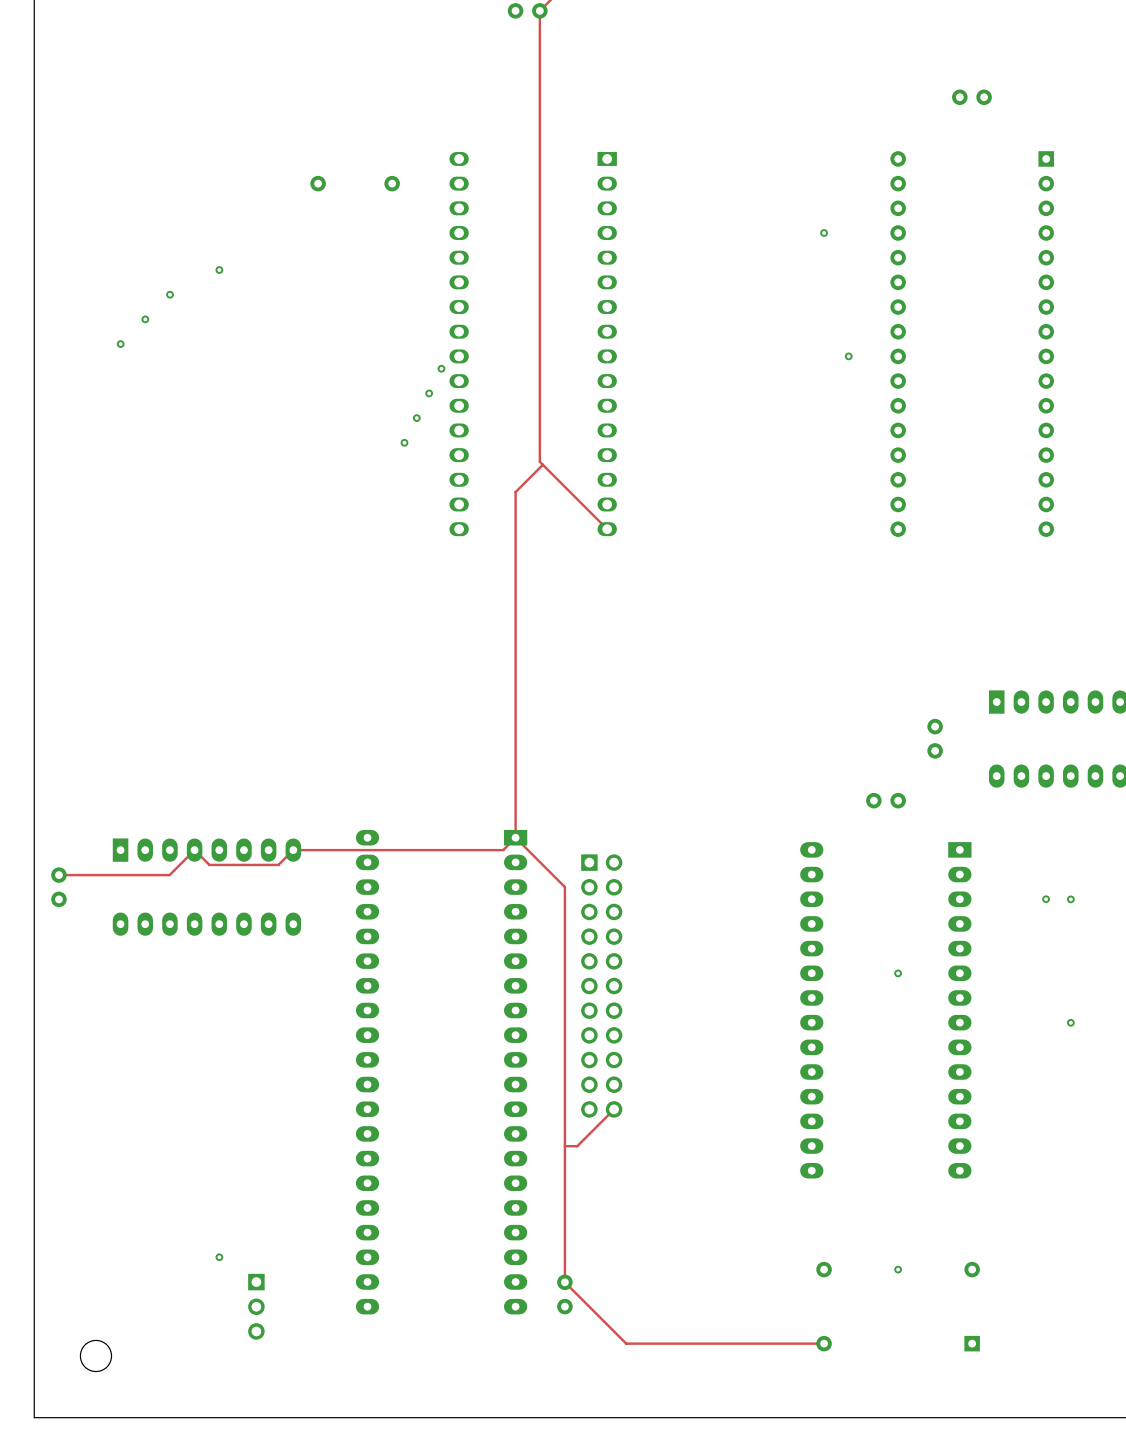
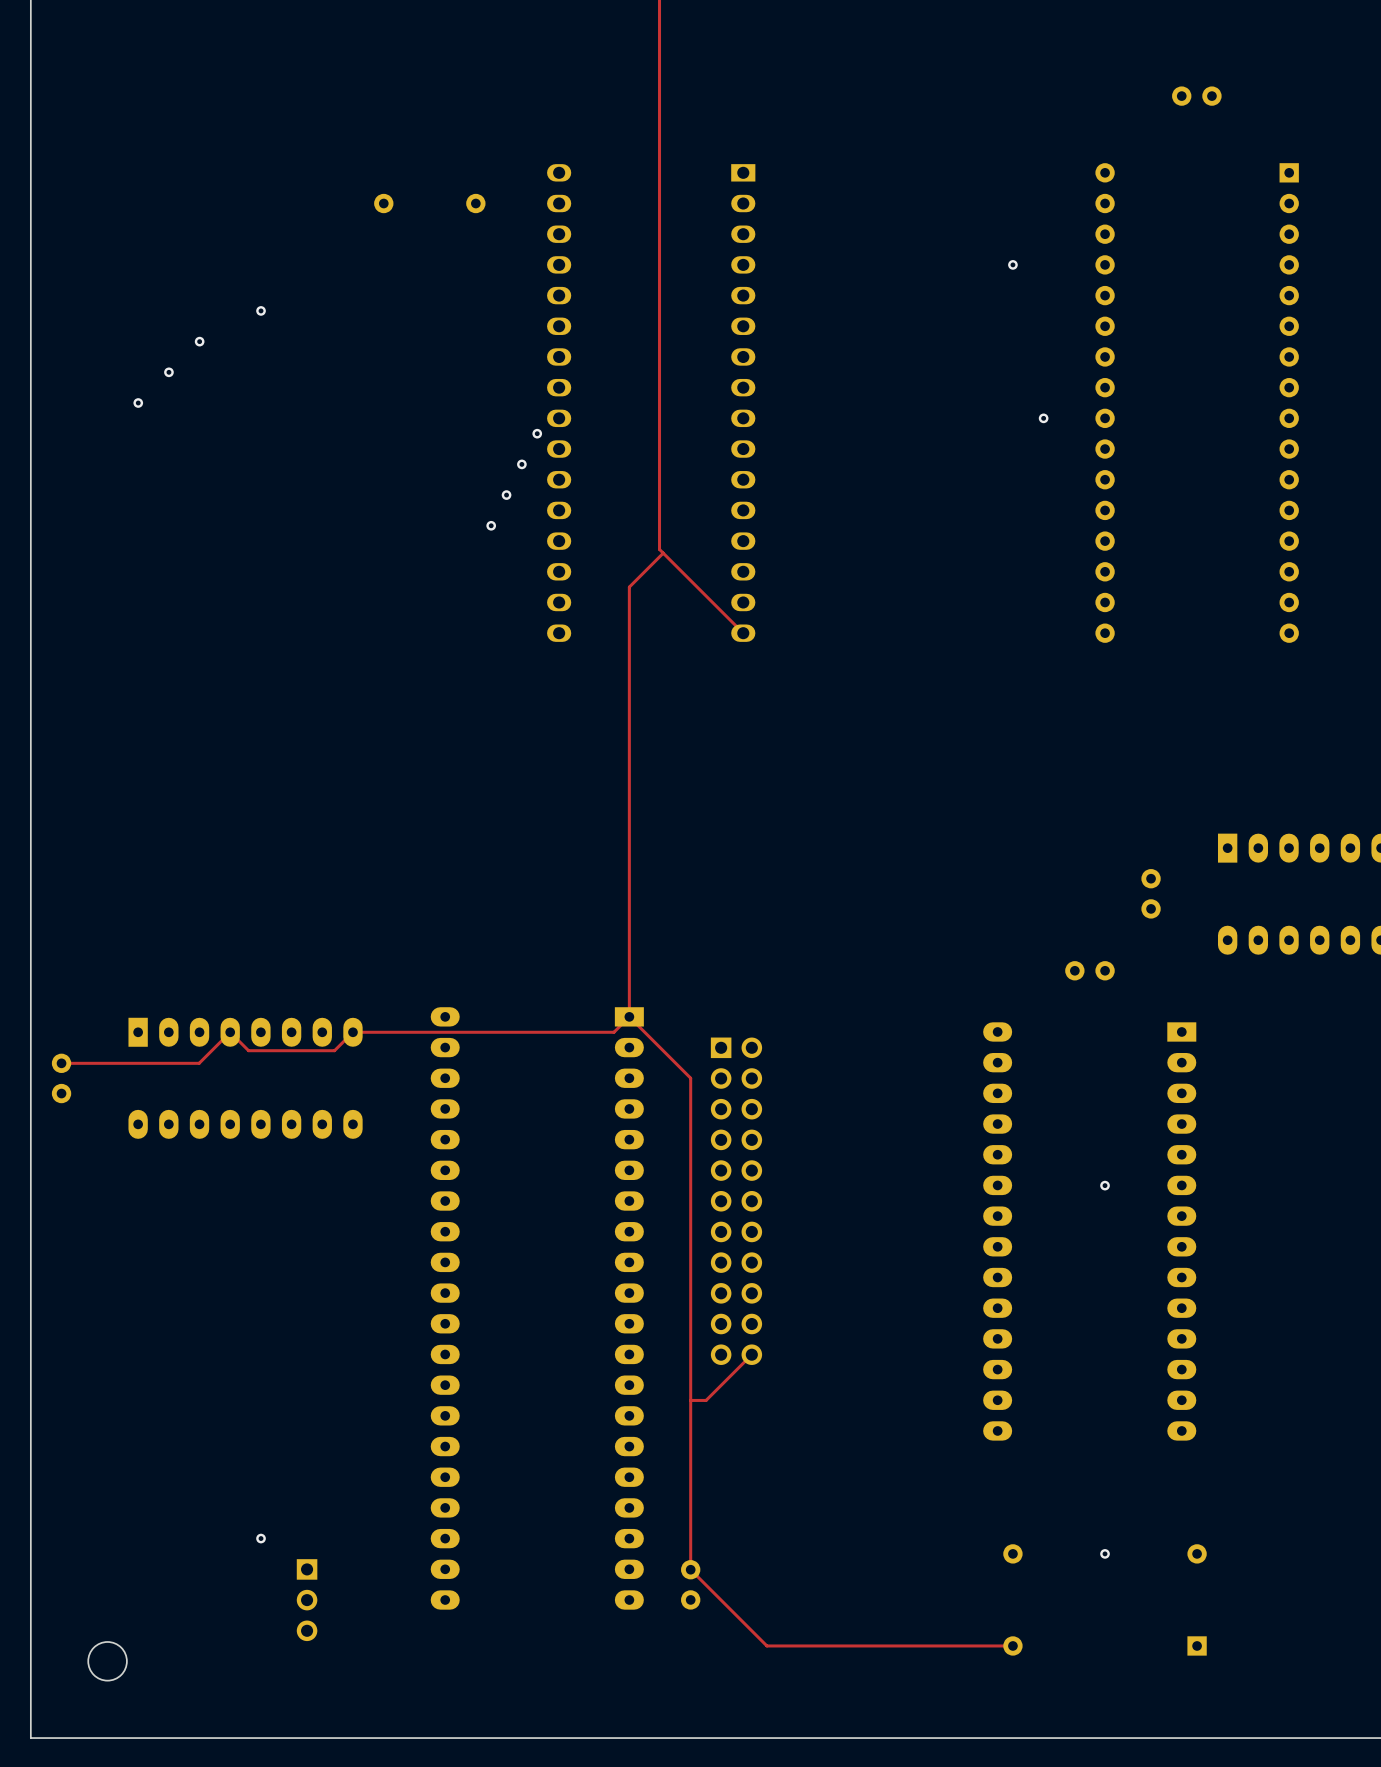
via: (1046, 899) -> none
via: (1070, 899) -> none
via: (1070, 1022) -> none

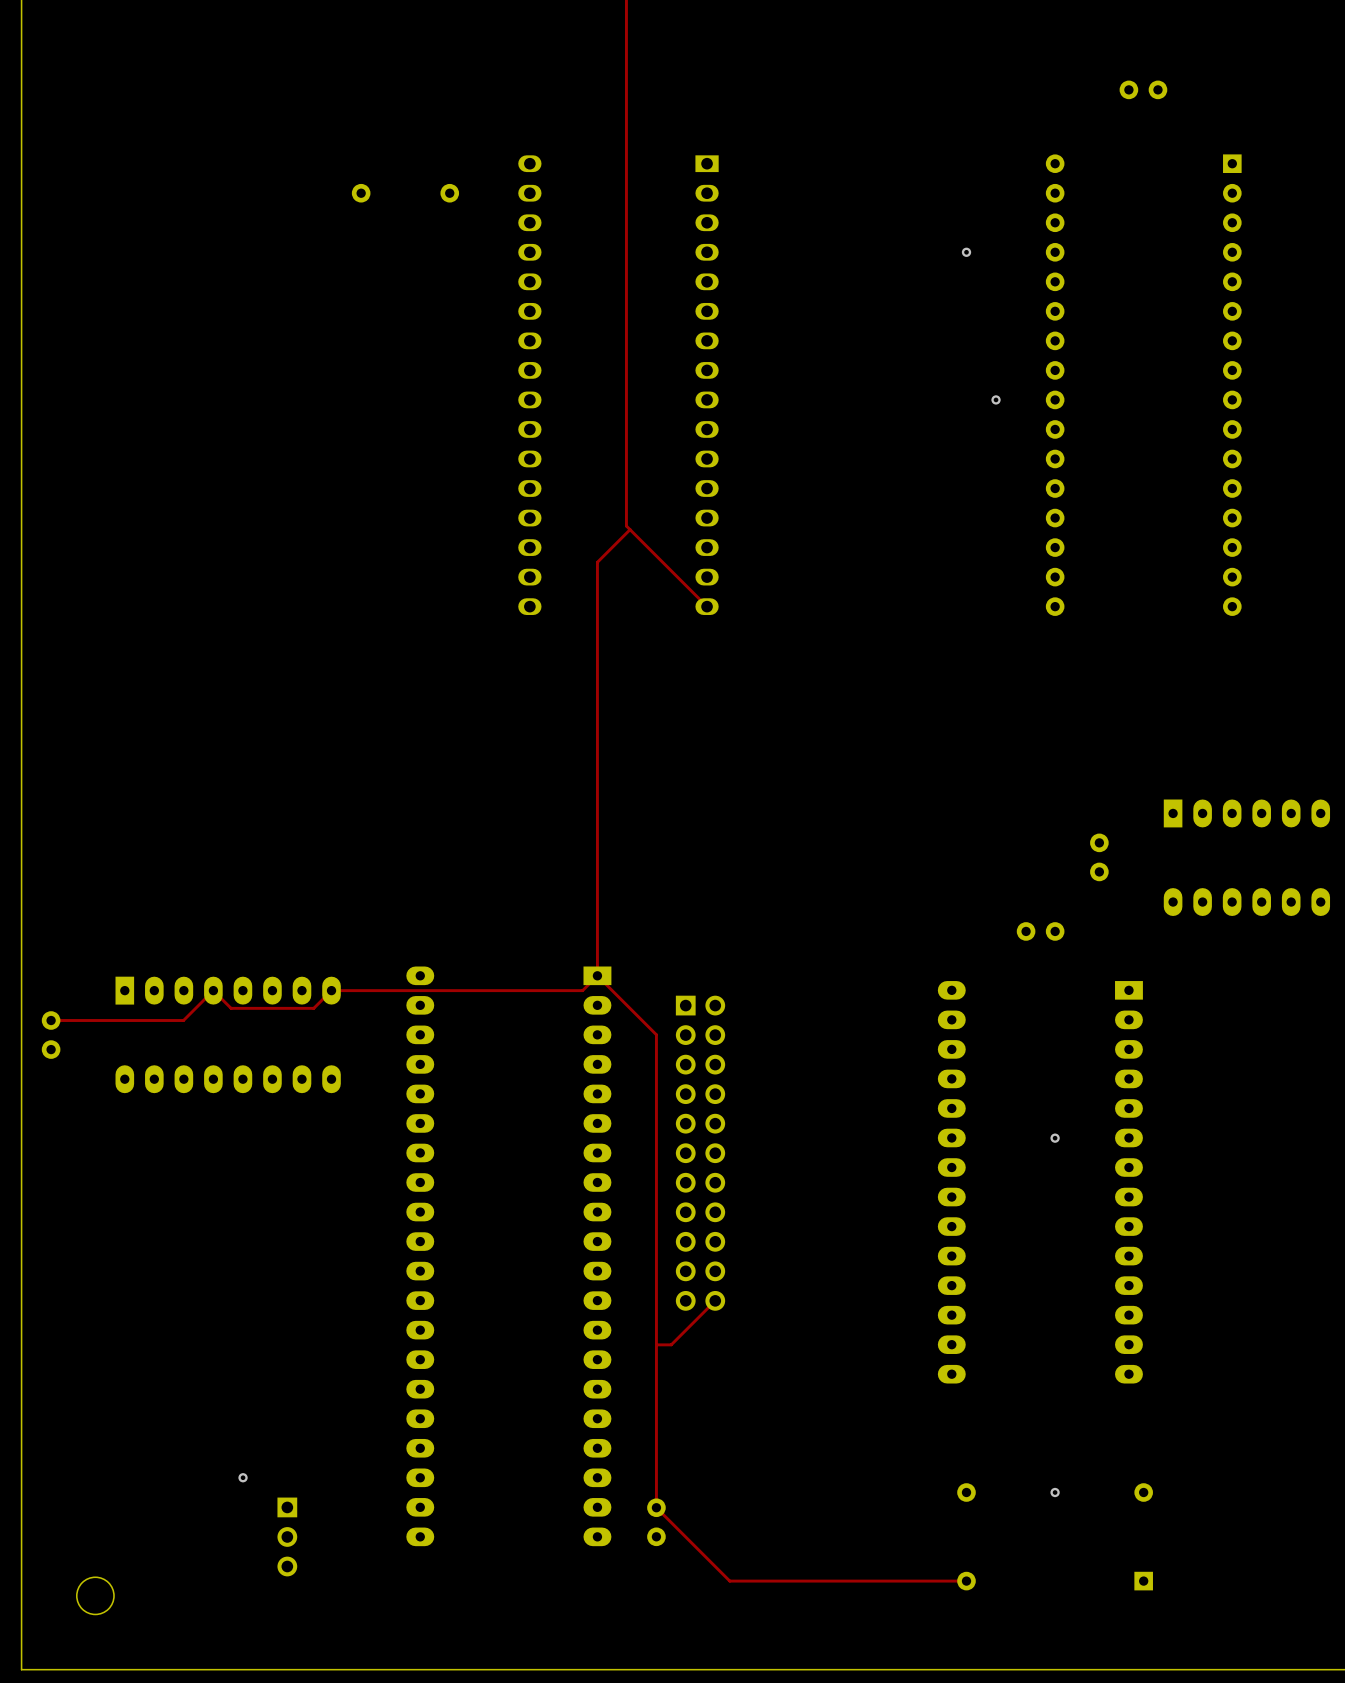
via: (261, 310) -> none
via: (199, 341) -> none
via: (168, 372) -> none
via: (138, 403) -> none
via: (537, 433) -> none
via: (521, 464) -> none
via: (506, 495) -> none
via: (491, 525) -> none

